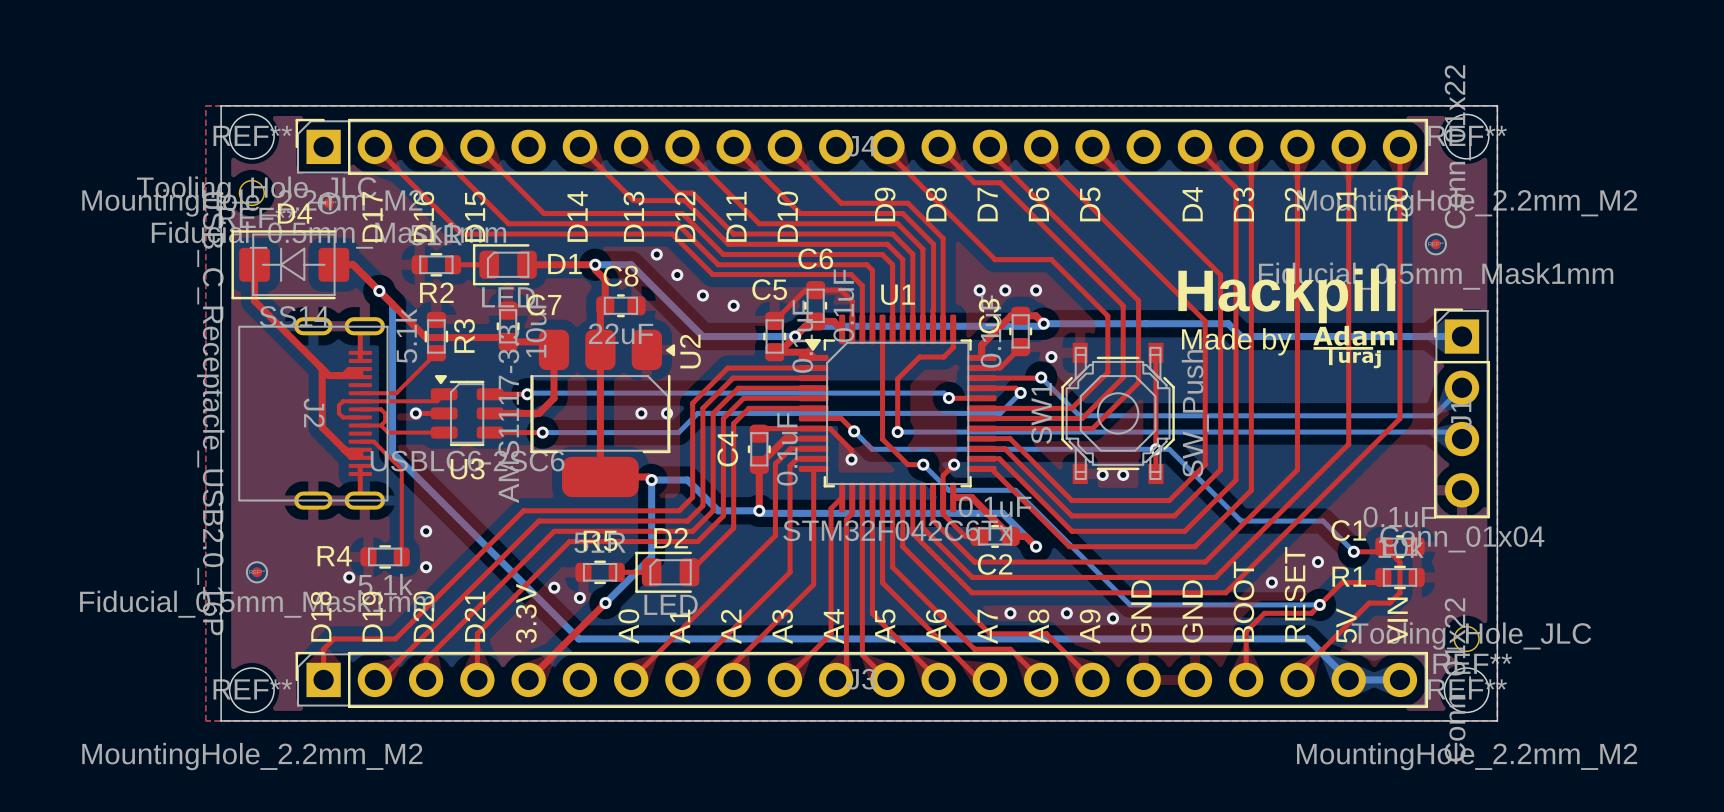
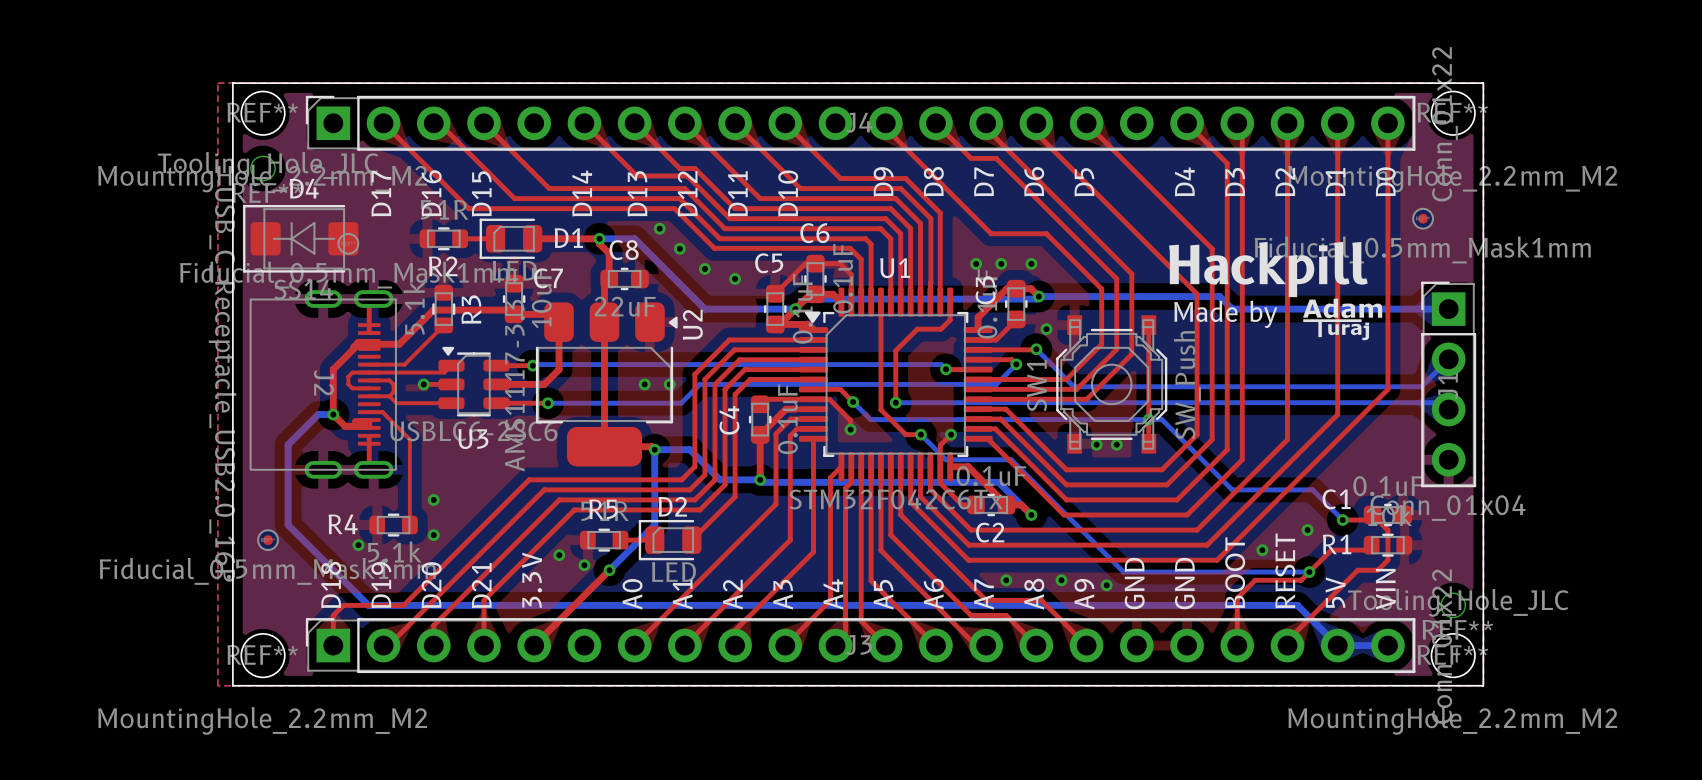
part position: (328, 203) -> (348, 243)
top track: (254, 264) (254, 301) (329, 375) (352, 375) -> none
top track: (333, 264) (353, 264) (425, 337) -> (361, 347) (358, 344) (399, 344) (433, 310)
bottom track: (379, 291) (392, 304) (392, 452) (578, 638) -> (333, 414) (318, 414) (288, 444) (288, 525) (368, 605) (583, 605)
via: (379, 291) -> none
top track: (322, 368) (322, 427) (351, 456) -> (360, 342) (333, 369) (333, 414) (345, 426) (360, 426)
via: none -> (333, 414)

